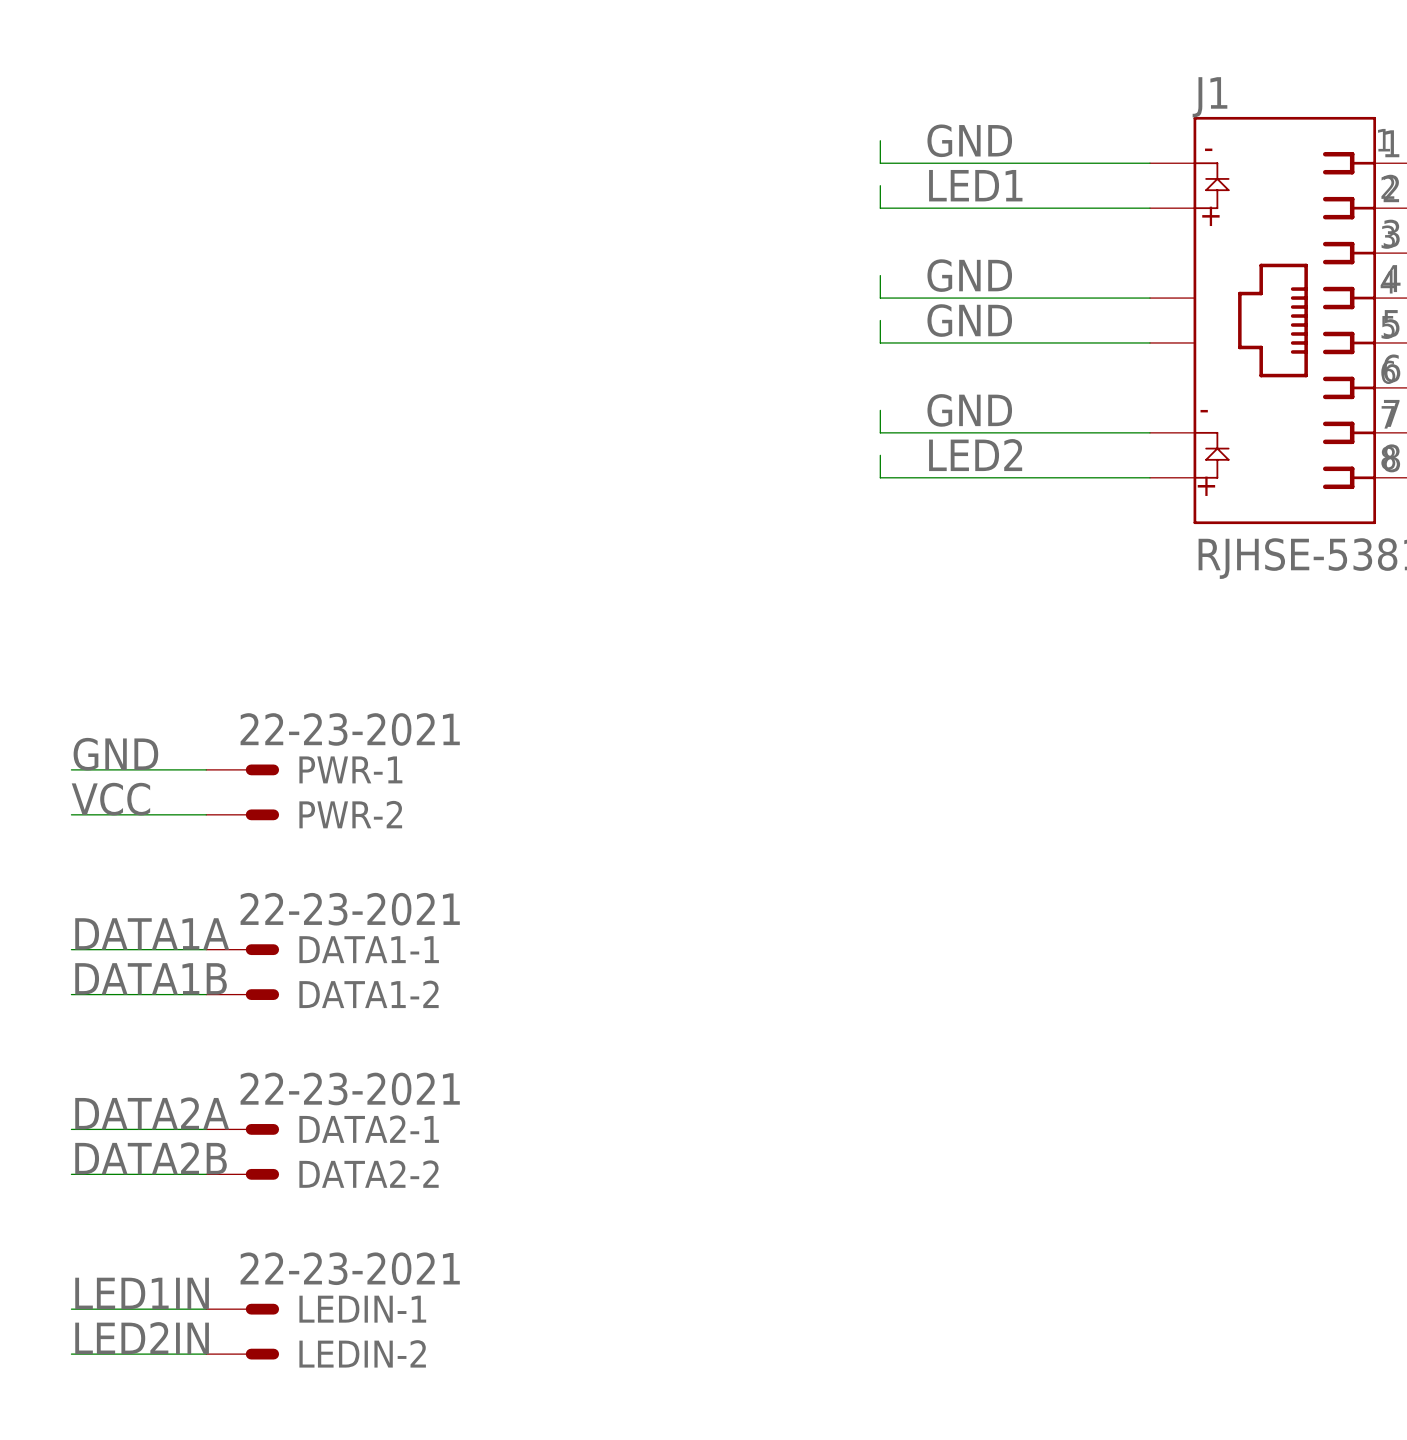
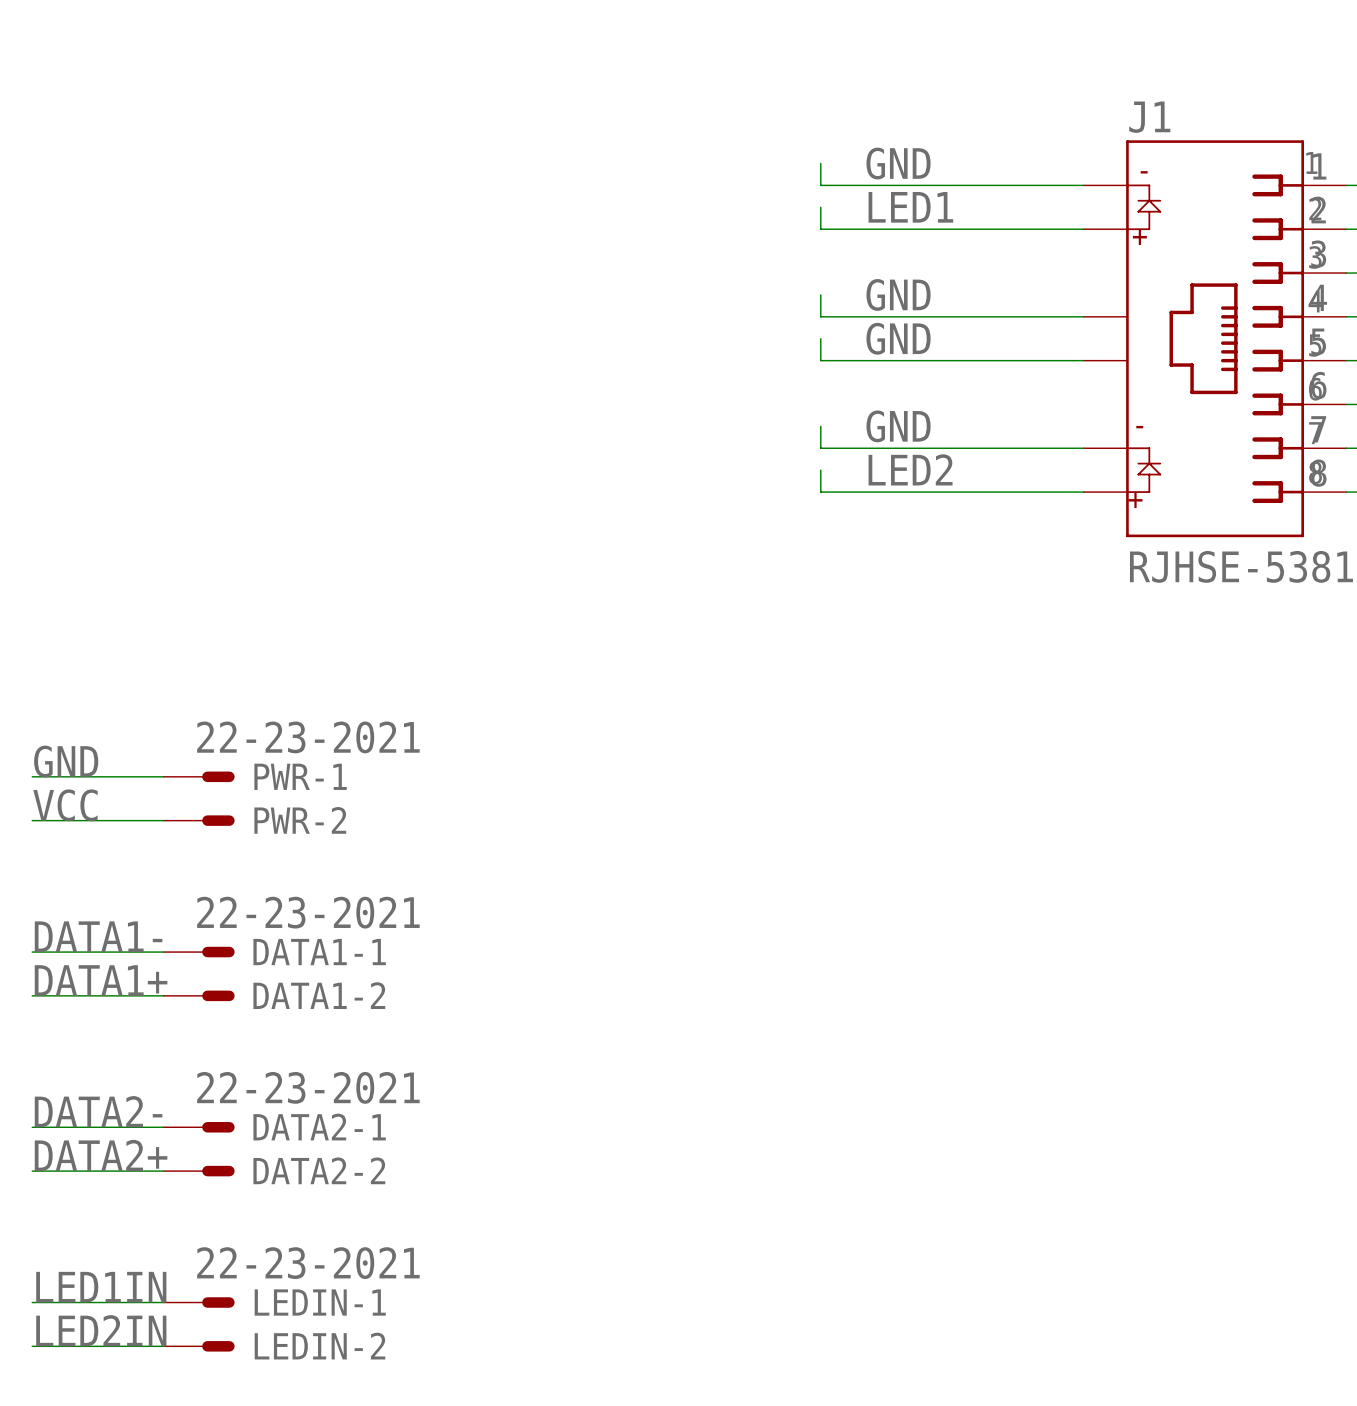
label: DATA1A (152, 933) -> DATA1- (98, 936)
label: DATA1B (151, 978) -> DATA1+ (101, 980)
label: DATA2A (152, 1113) -> DATA2- (98, 1111)
label: DATA2B (151, 1158) -> DATA2+ (101, 1155)

